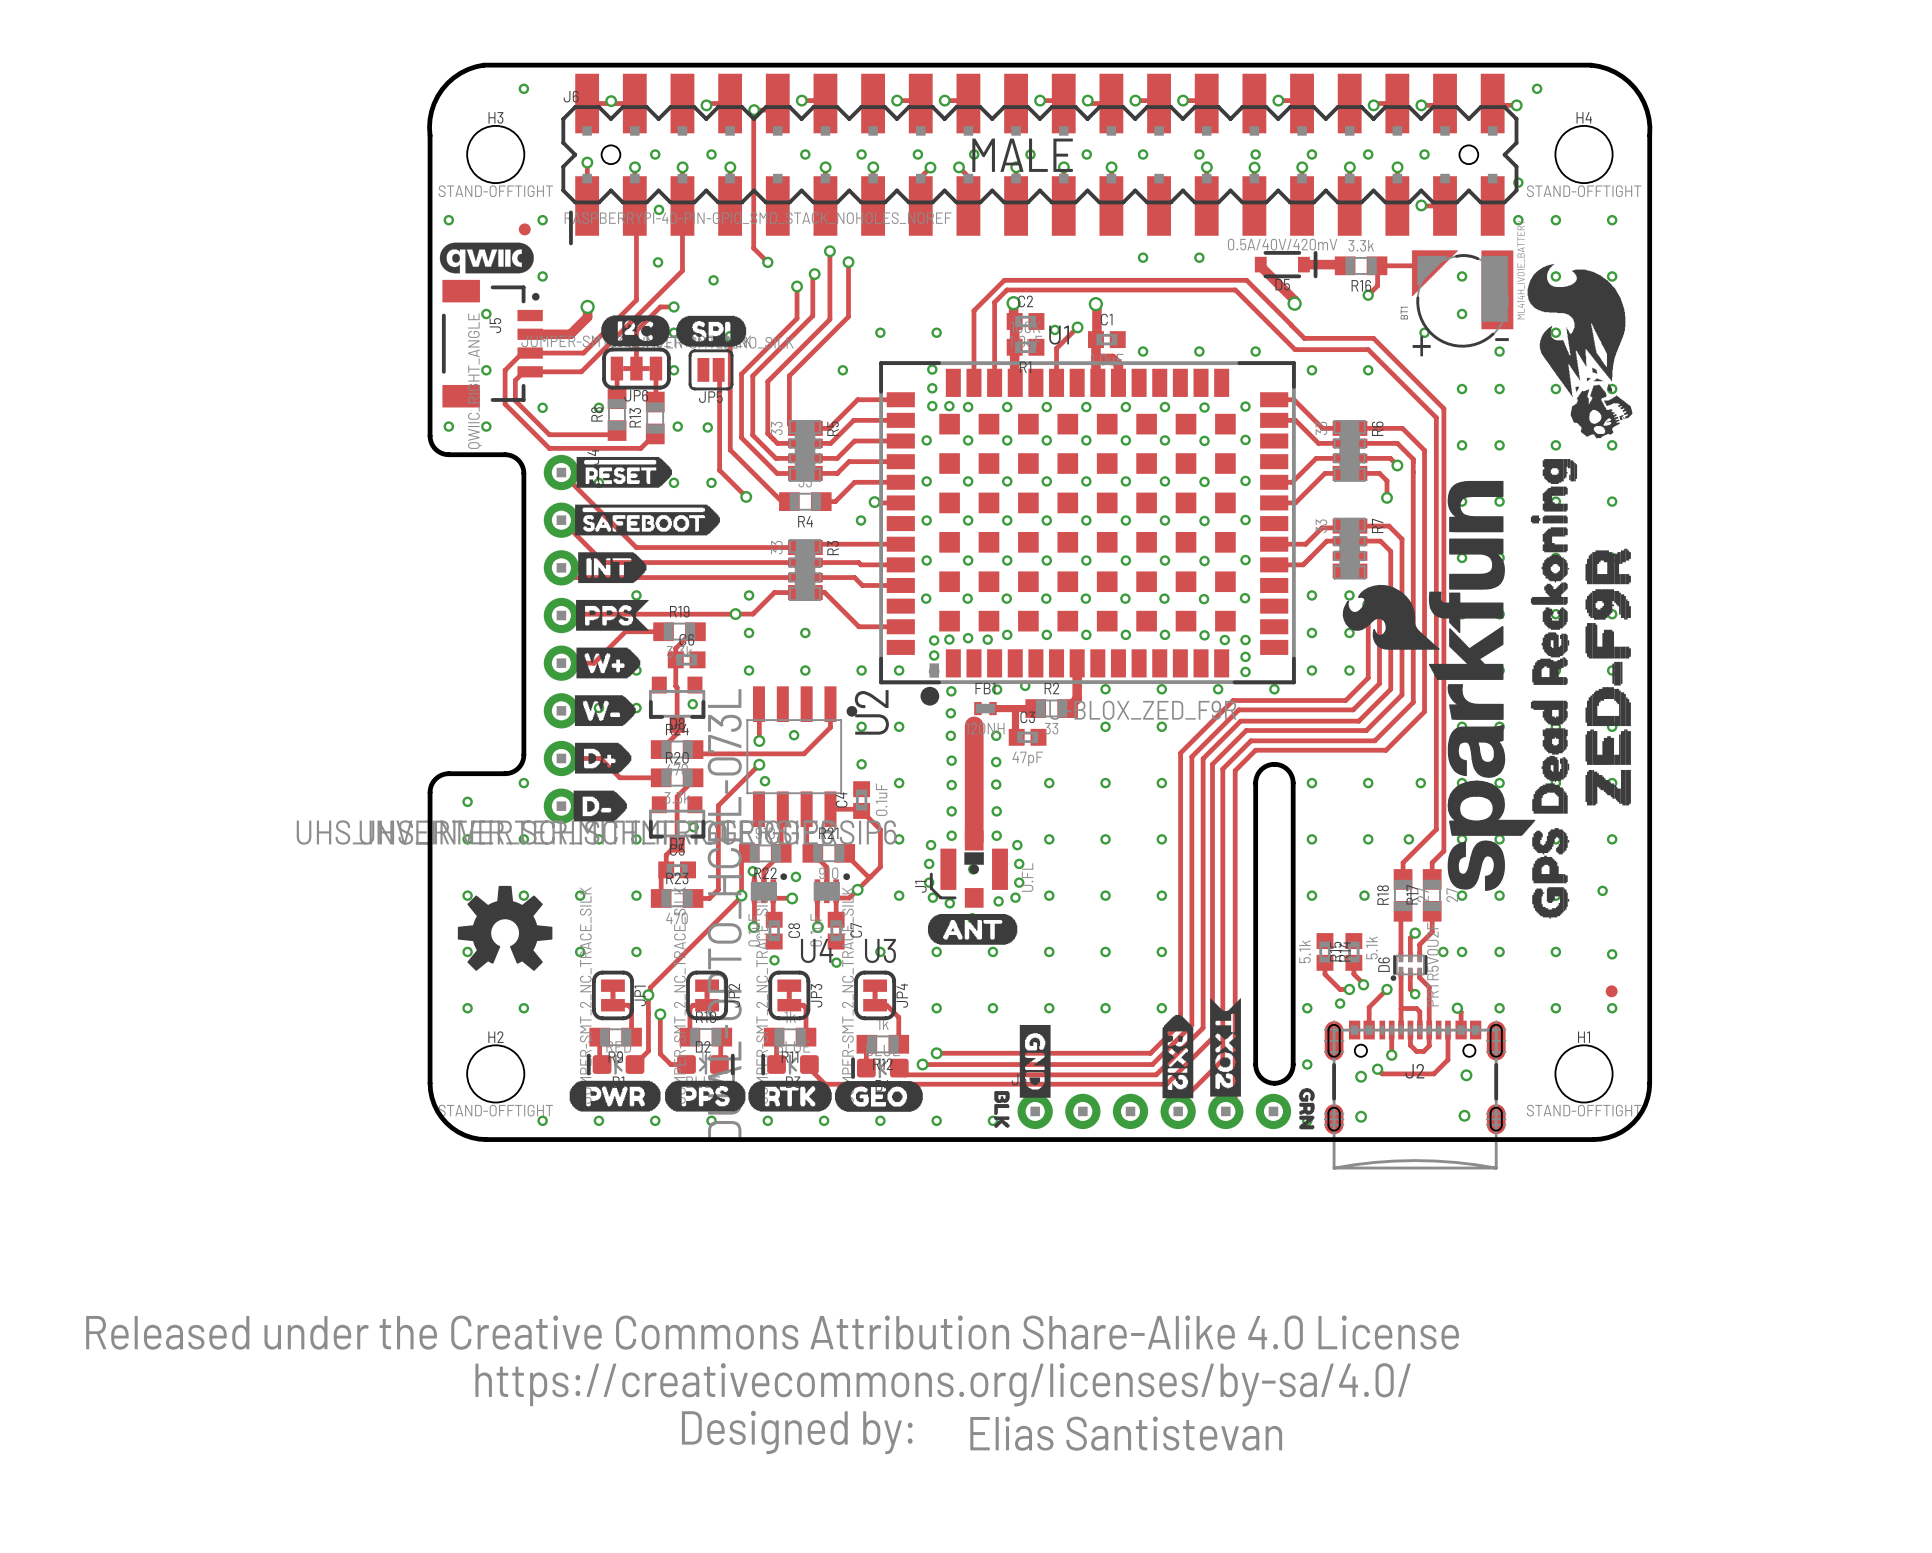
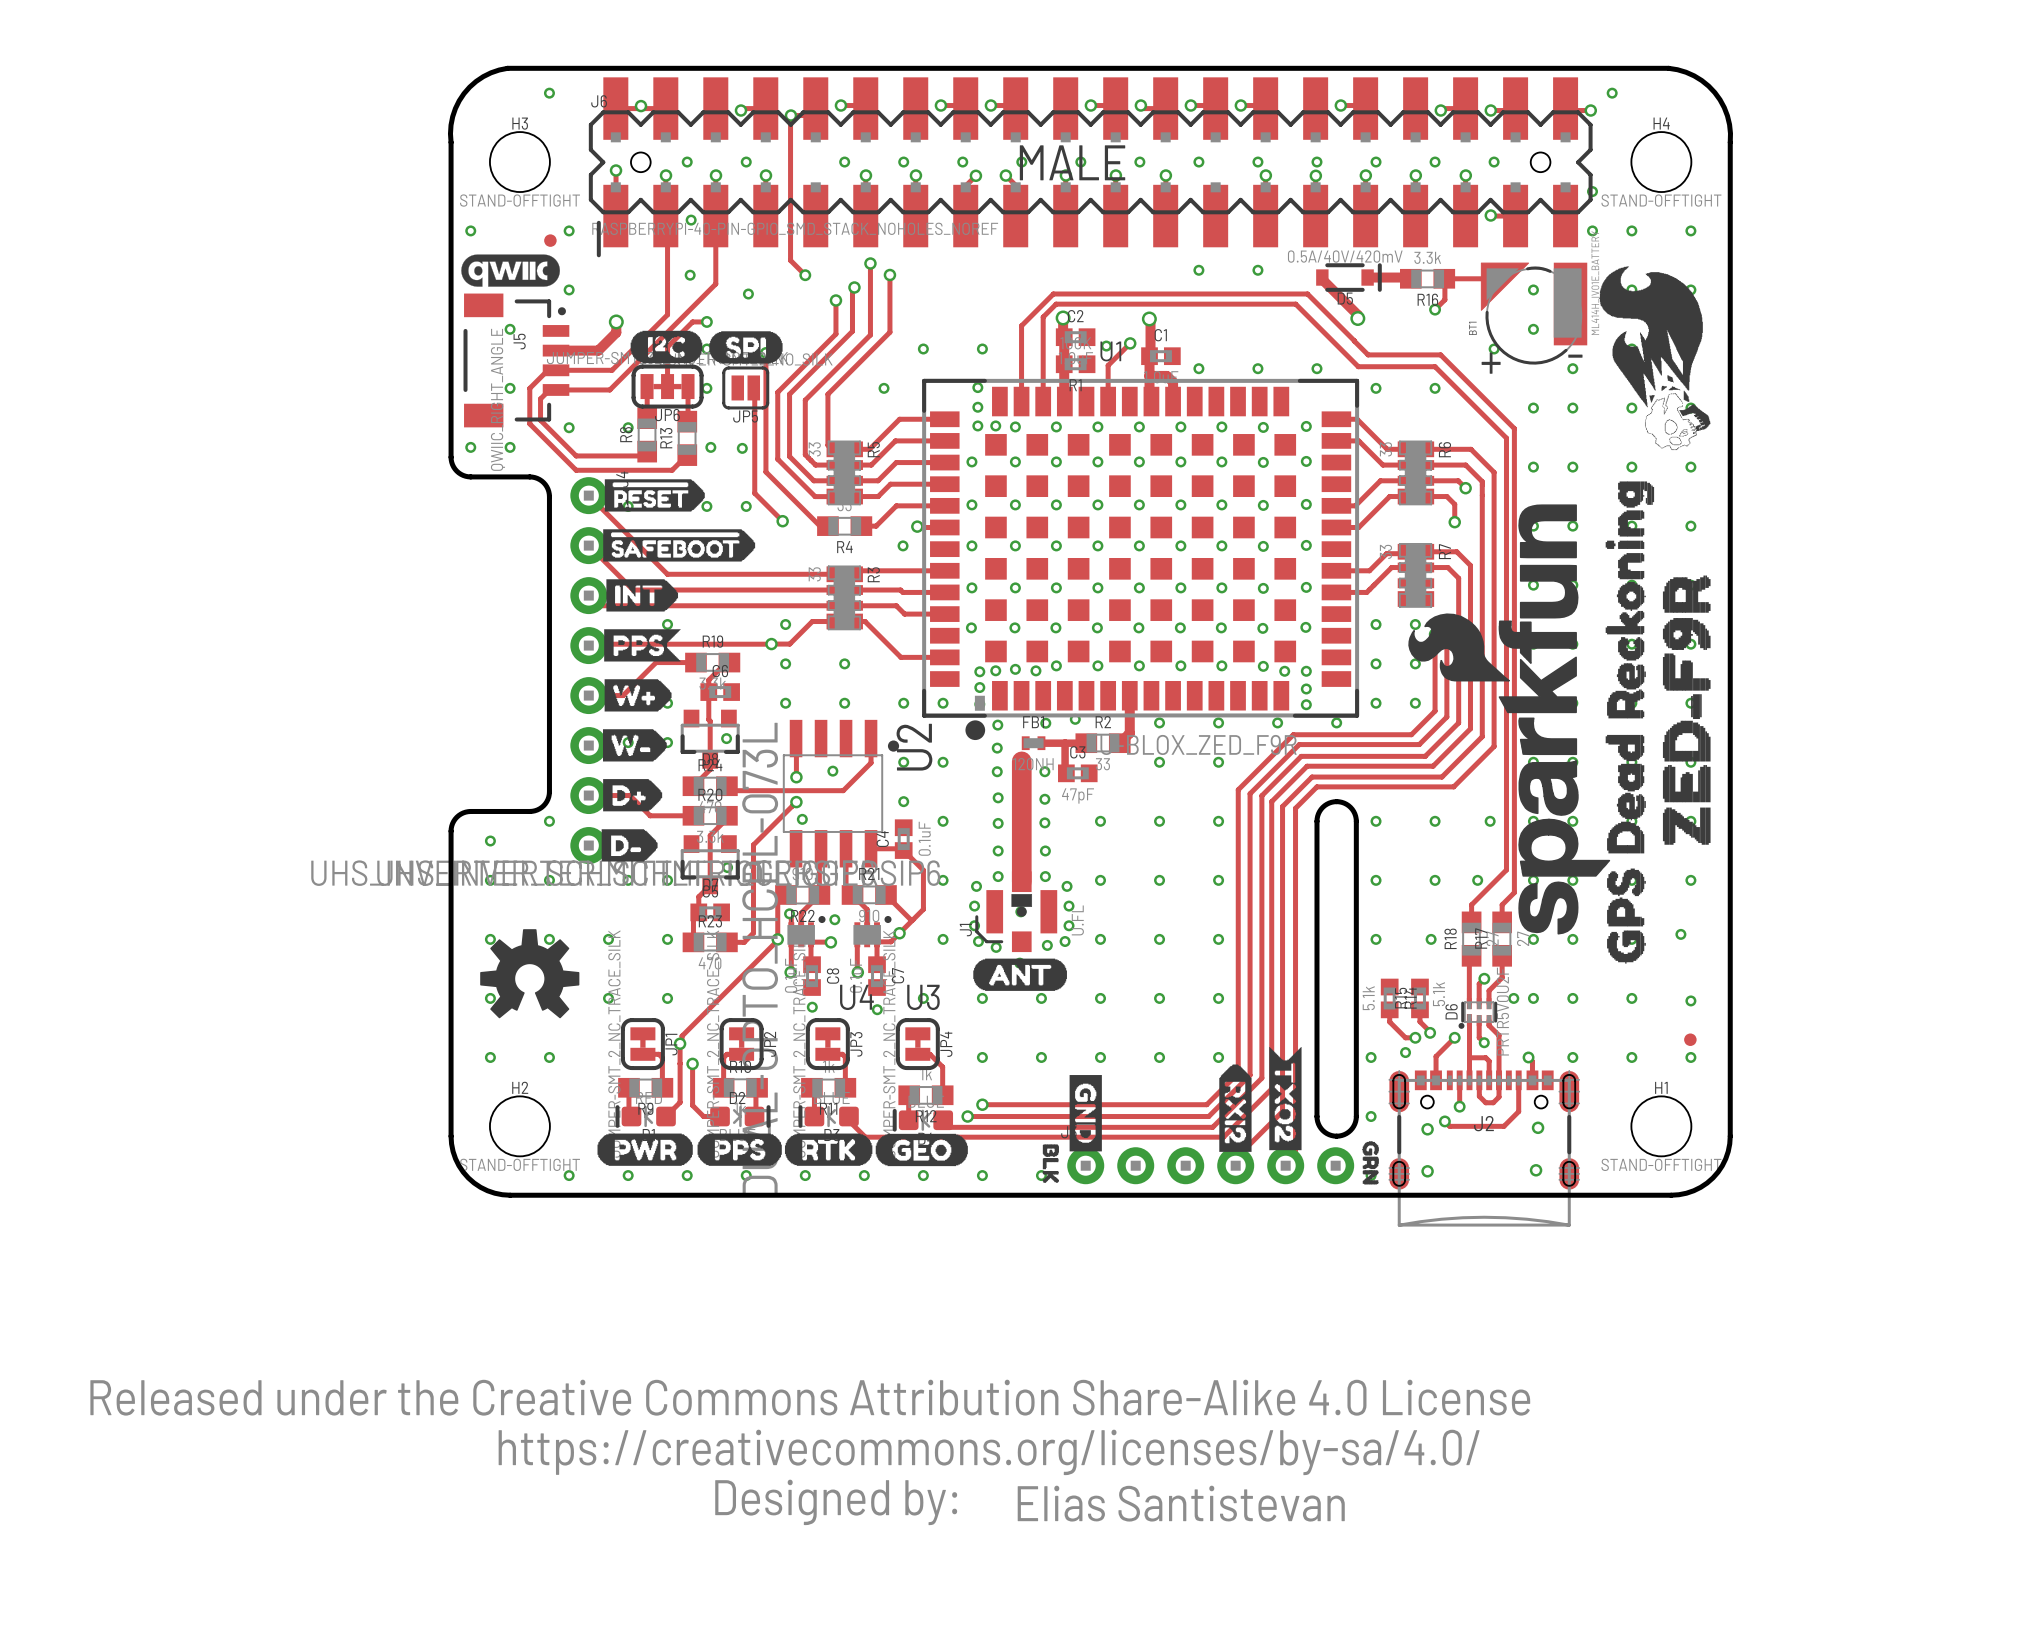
drawing shape: [1527, 263, 1633, 439] -> [1599, 266, 1711, 451]

